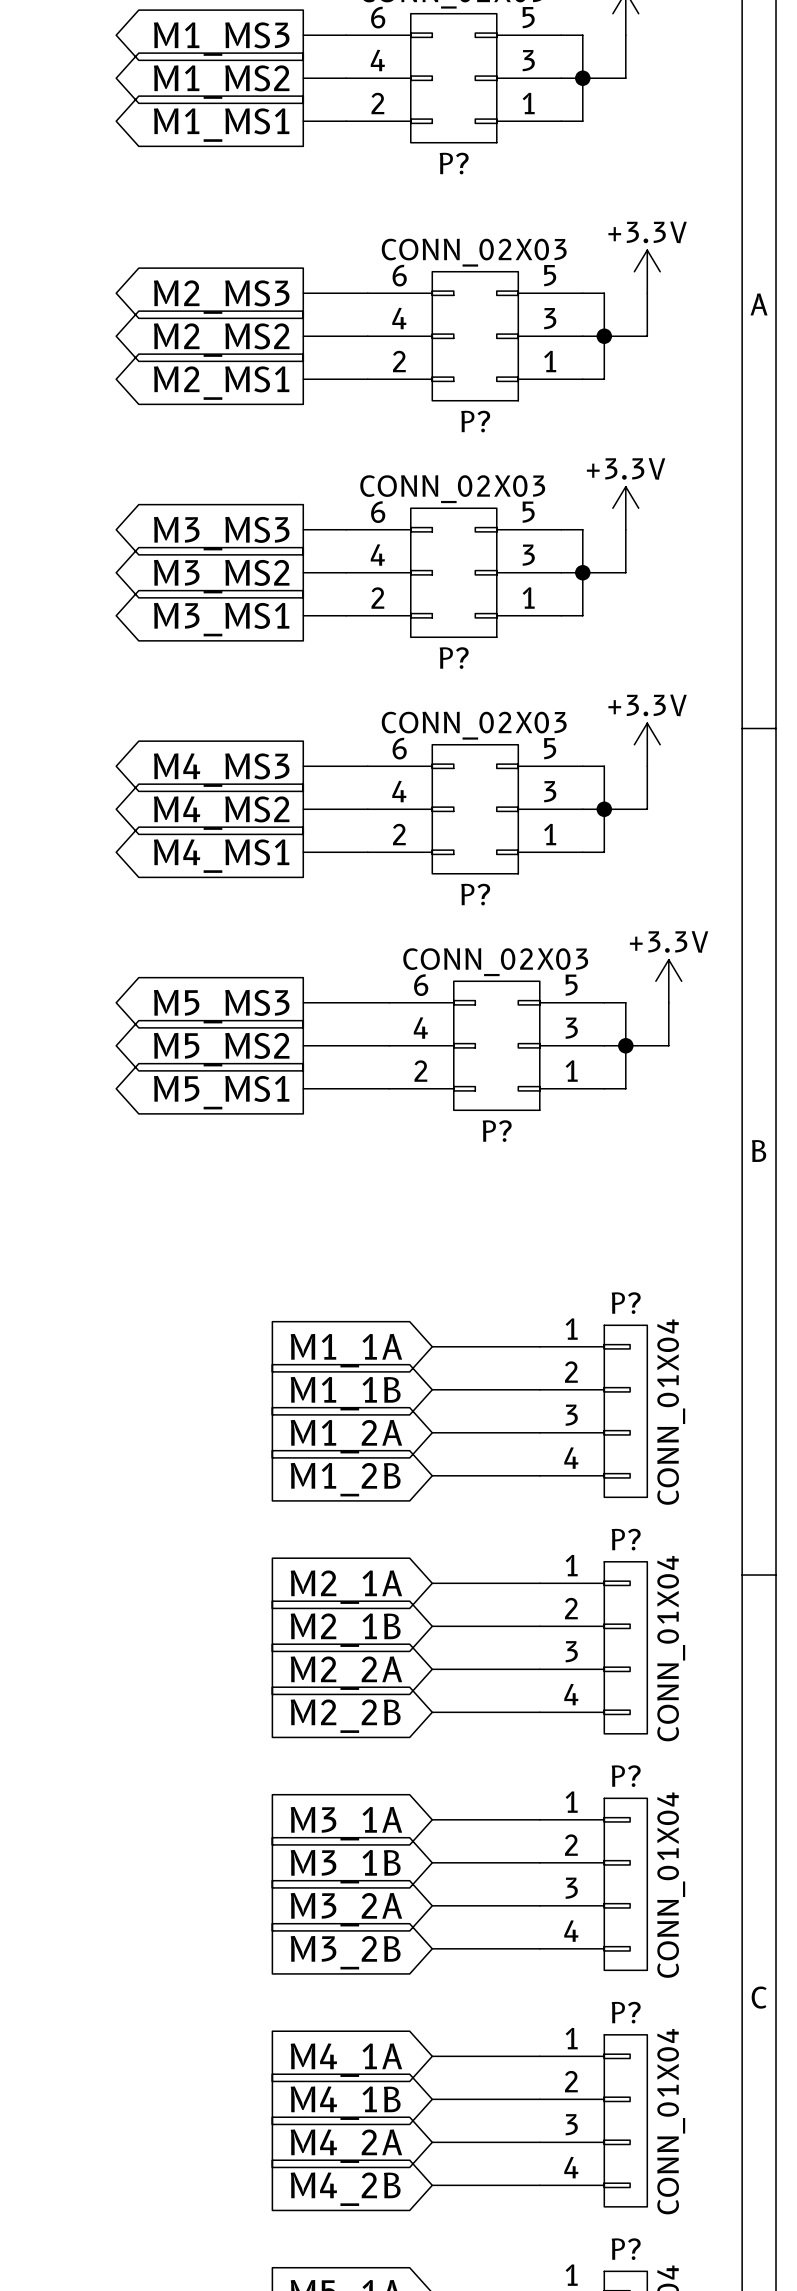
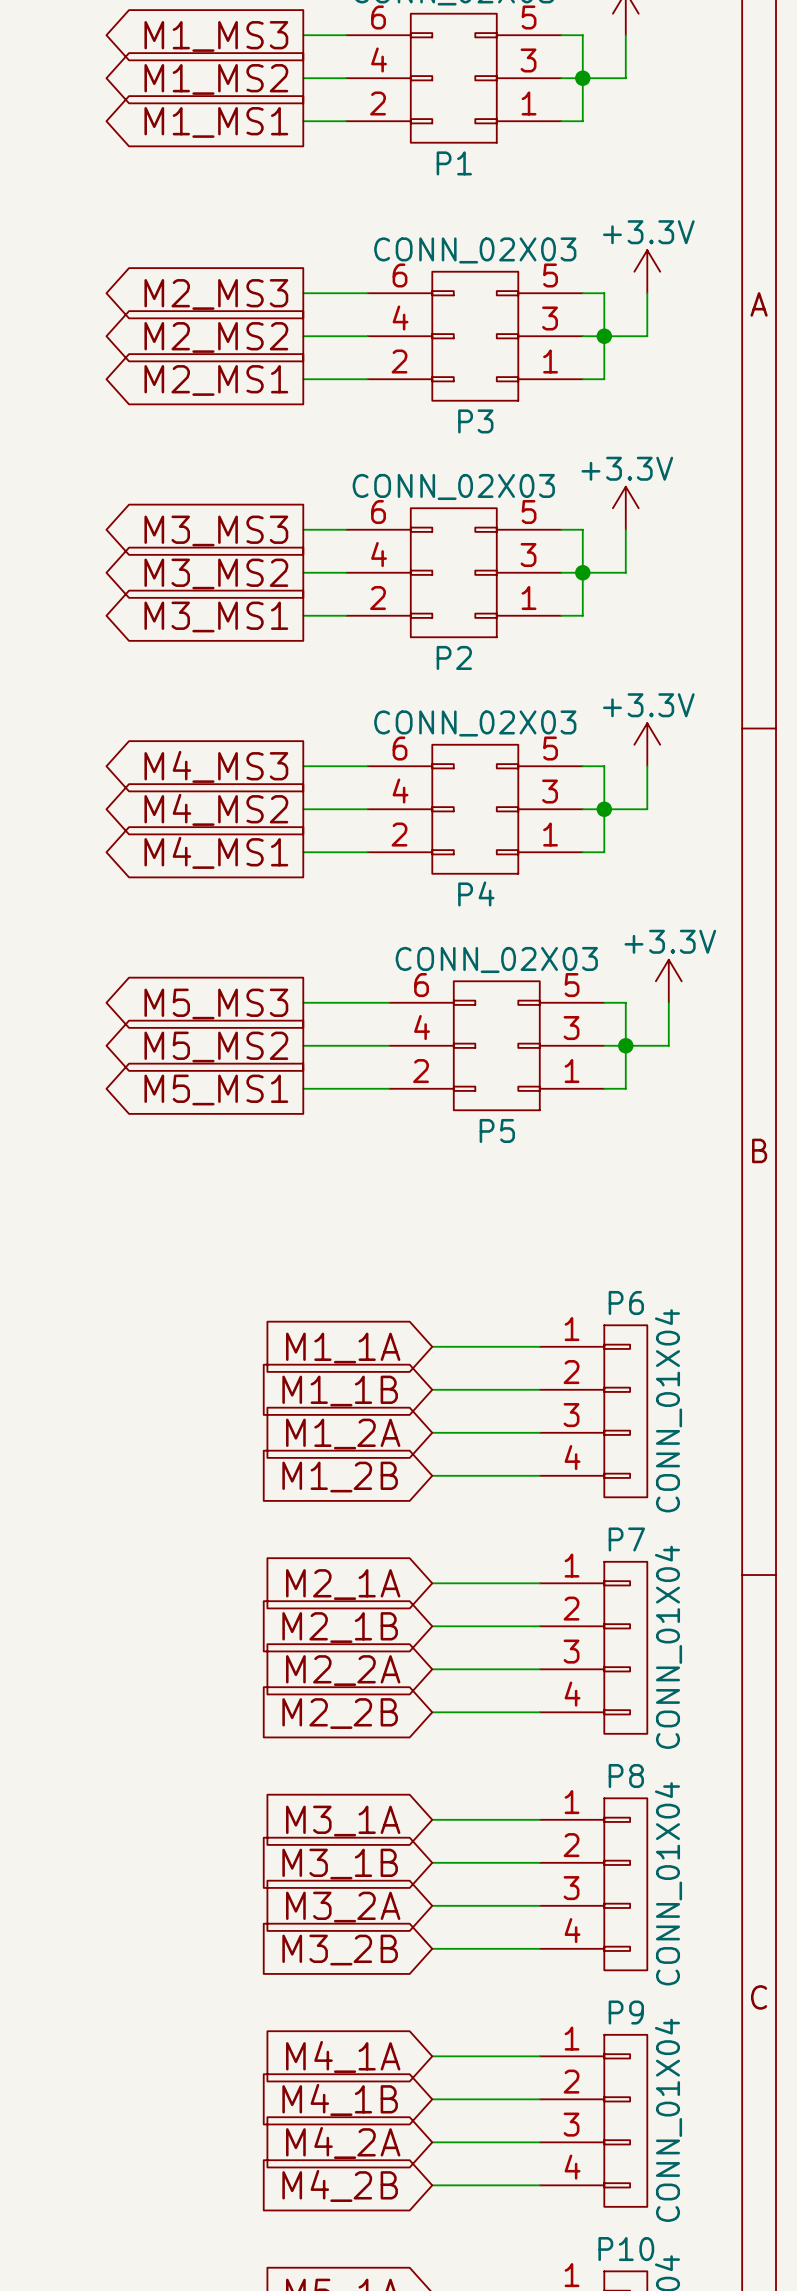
P? name: P? (454, 163) -> P1 (454, 163)
P? name: P? (475, 421) -> P3 (475, 421)
P? name: P? (454, 658) -> P2 (454, 657)
P? name: P? (475, 894) -> P4 (476, 893)
P? name: P? (497, 1131) -> P5 (497, 1130)
P? name: P? (626, 1303) -> P6 (626, 1302)
P? name: P? (626, 1539) -> P7 (626, 1539)
P? name: P? (626, 1776) -> P8 (626, 1776)
P? name: P? (626, 2012) -> P9 (626, 2012)
P? name: P? (626, 2249) -> P10 (626, 2249)

